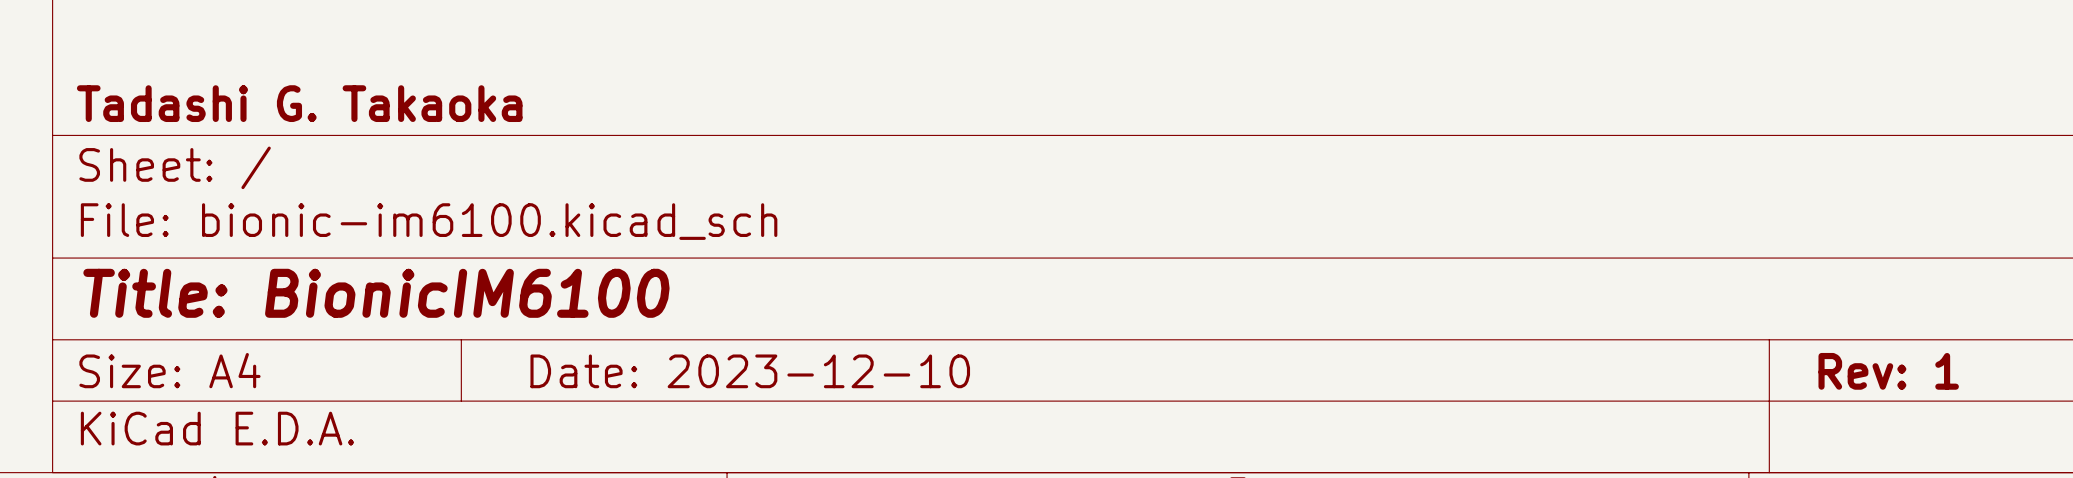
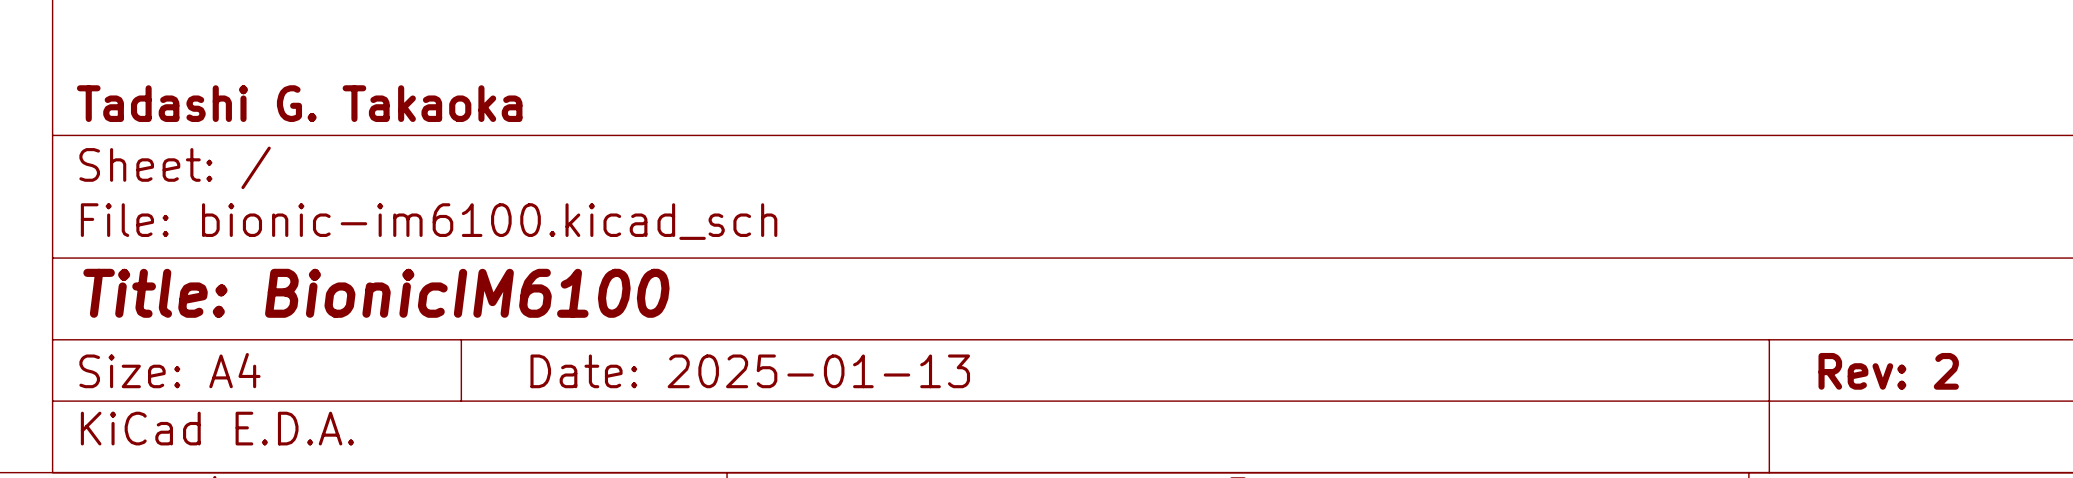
title block: Date: 2023-12-10 (750, 371) -> Date: 2025-01-13 (750, 371)
title block: Rev: 1 (1888, 371) -> Rev: 2 (1888, 371)

